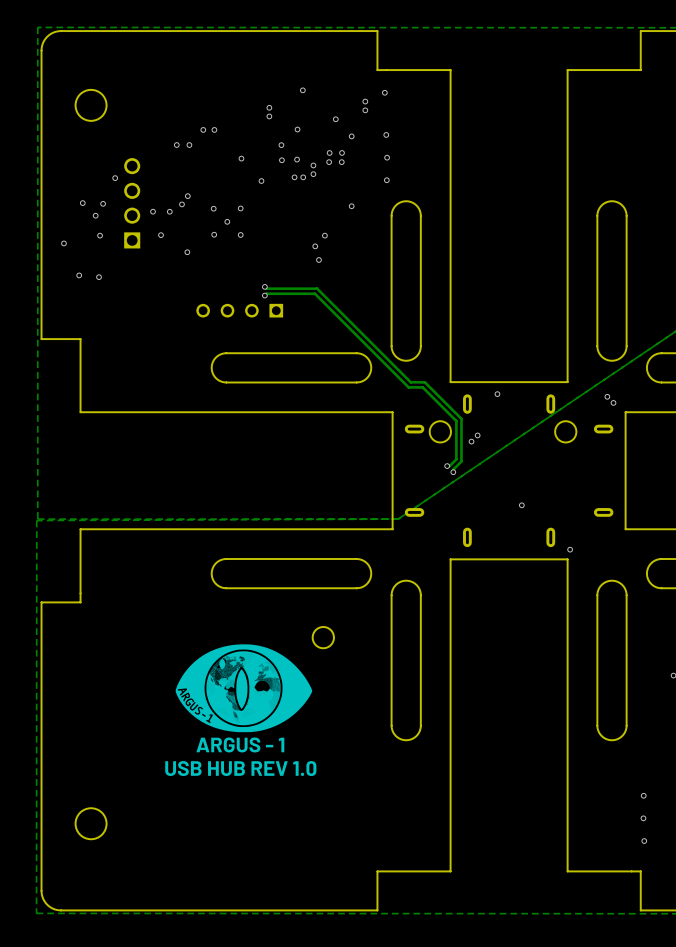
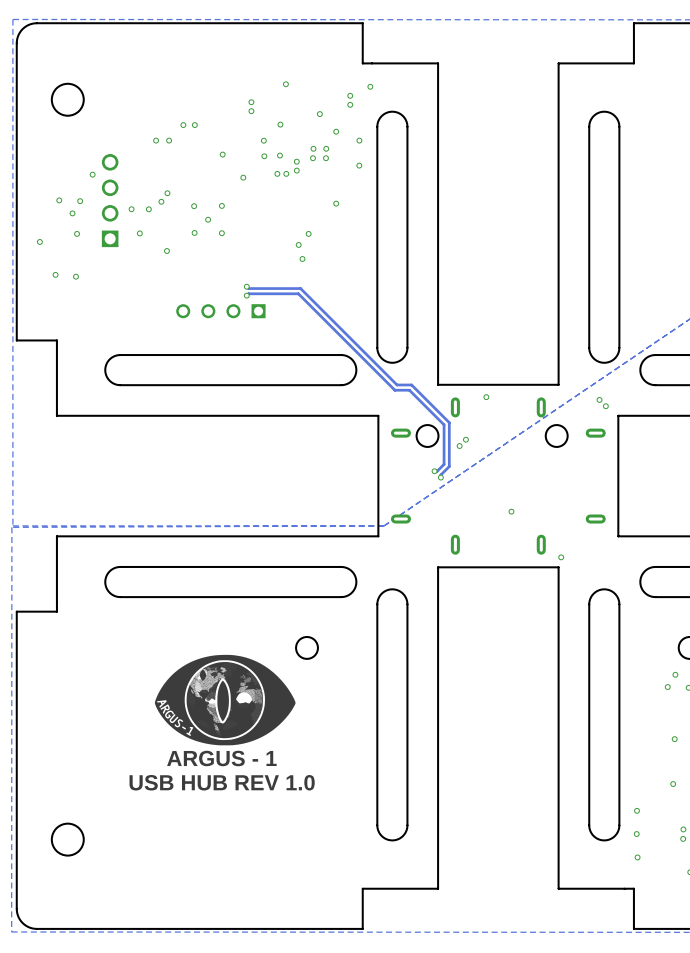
via: (386, 134) -> none
via: none -> (359, 140)
via: (387, 157) -> none
via: none -> (359, 165)
via: (386, 180) -> none
board edge: (420, 215) (416, 205) (406, 201) (395, 205) (391, 215) -> (407, 213) (407, 124) (402, 115) (392, 111) (382, 115) (377, 124) (377, 213)
board edge: (626, 215) (622, 206) (611, 201) (602, 204) (597, 215) -> (619, 213) (619, 124) (614, 115) (604, 111) (594, 115) (589, 124) (589, 213)
board edge: (226, 353) (215, 357) (211, 367) (215, 378) (226, 382) -> (207, 355) (118, 355) (109, 360) (105, 370) (109, 380) (118, 385) (207, 385)
board edge: (226, 559) (215, 563) (211, 573) (215, 583) (226, 588) -> (207, 566) (118, 567) (109, 571) (105, 582) (109, 592) (118, 596) (207, 597)
board edge: (420, 725) (416, 735) (406, 740) (395, 735) (391, 725) -> (407, 738) (407, 827) (401, 837) (392, 840) (383, 837) (377, 827) (377, 738)
board edge: (626, 725) (622, 735) (611, 740) (601, 735) (597, 725) -> (619, 738) (619, 827) (614, 836) (604, 840) (594, 836) (589, 827) (589, 738)

